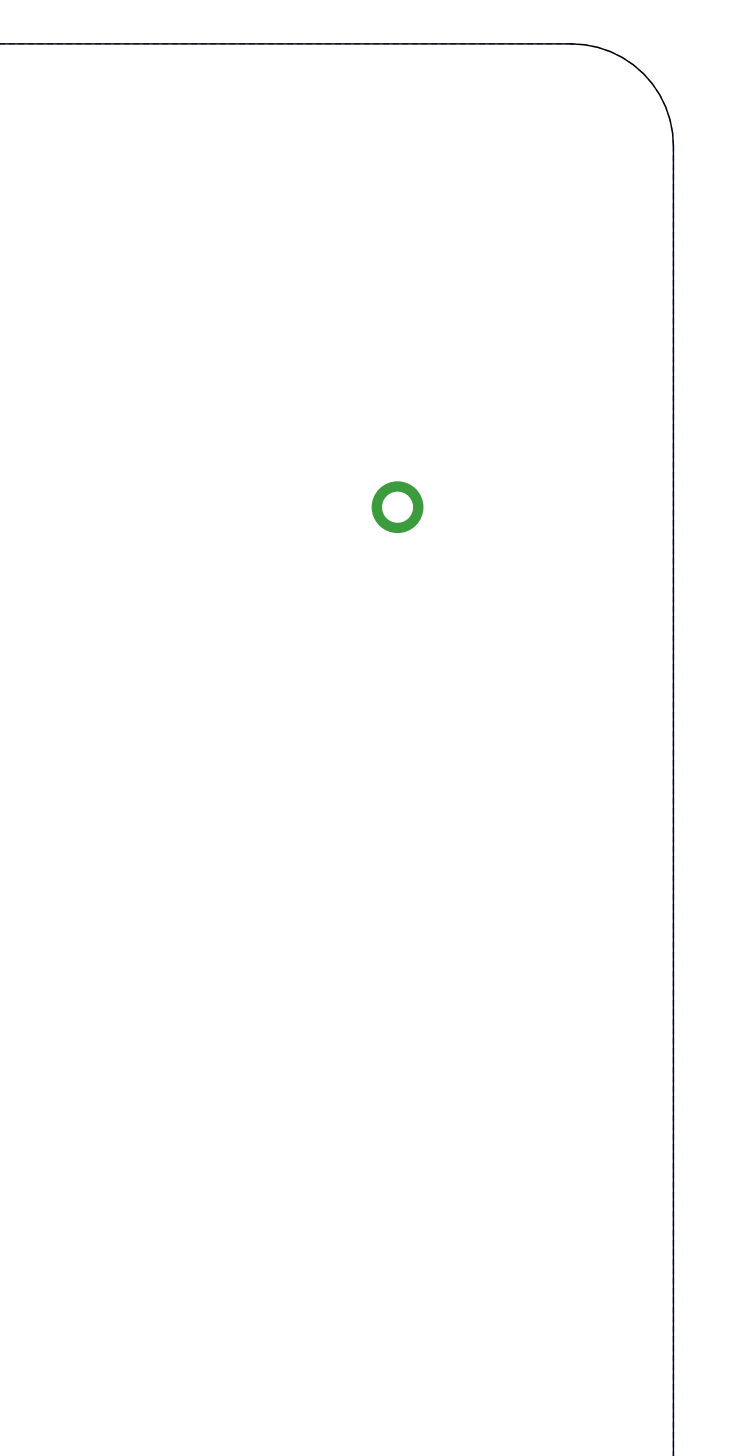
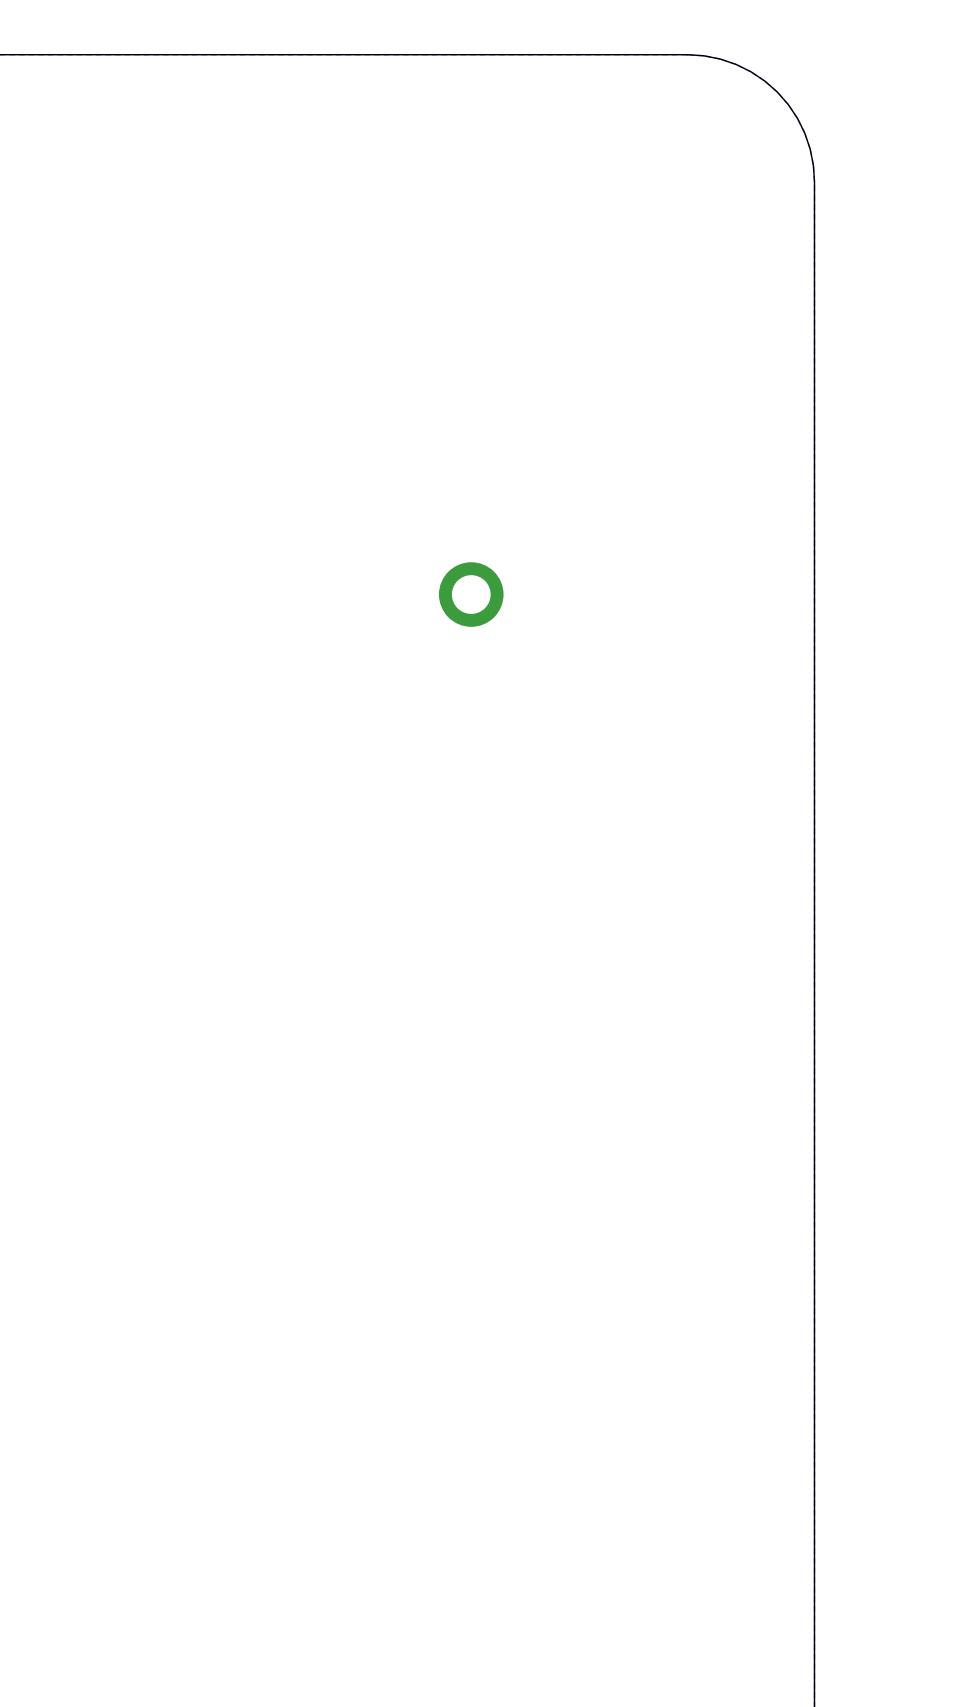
via position: (397, 507) -> (471, 594)

